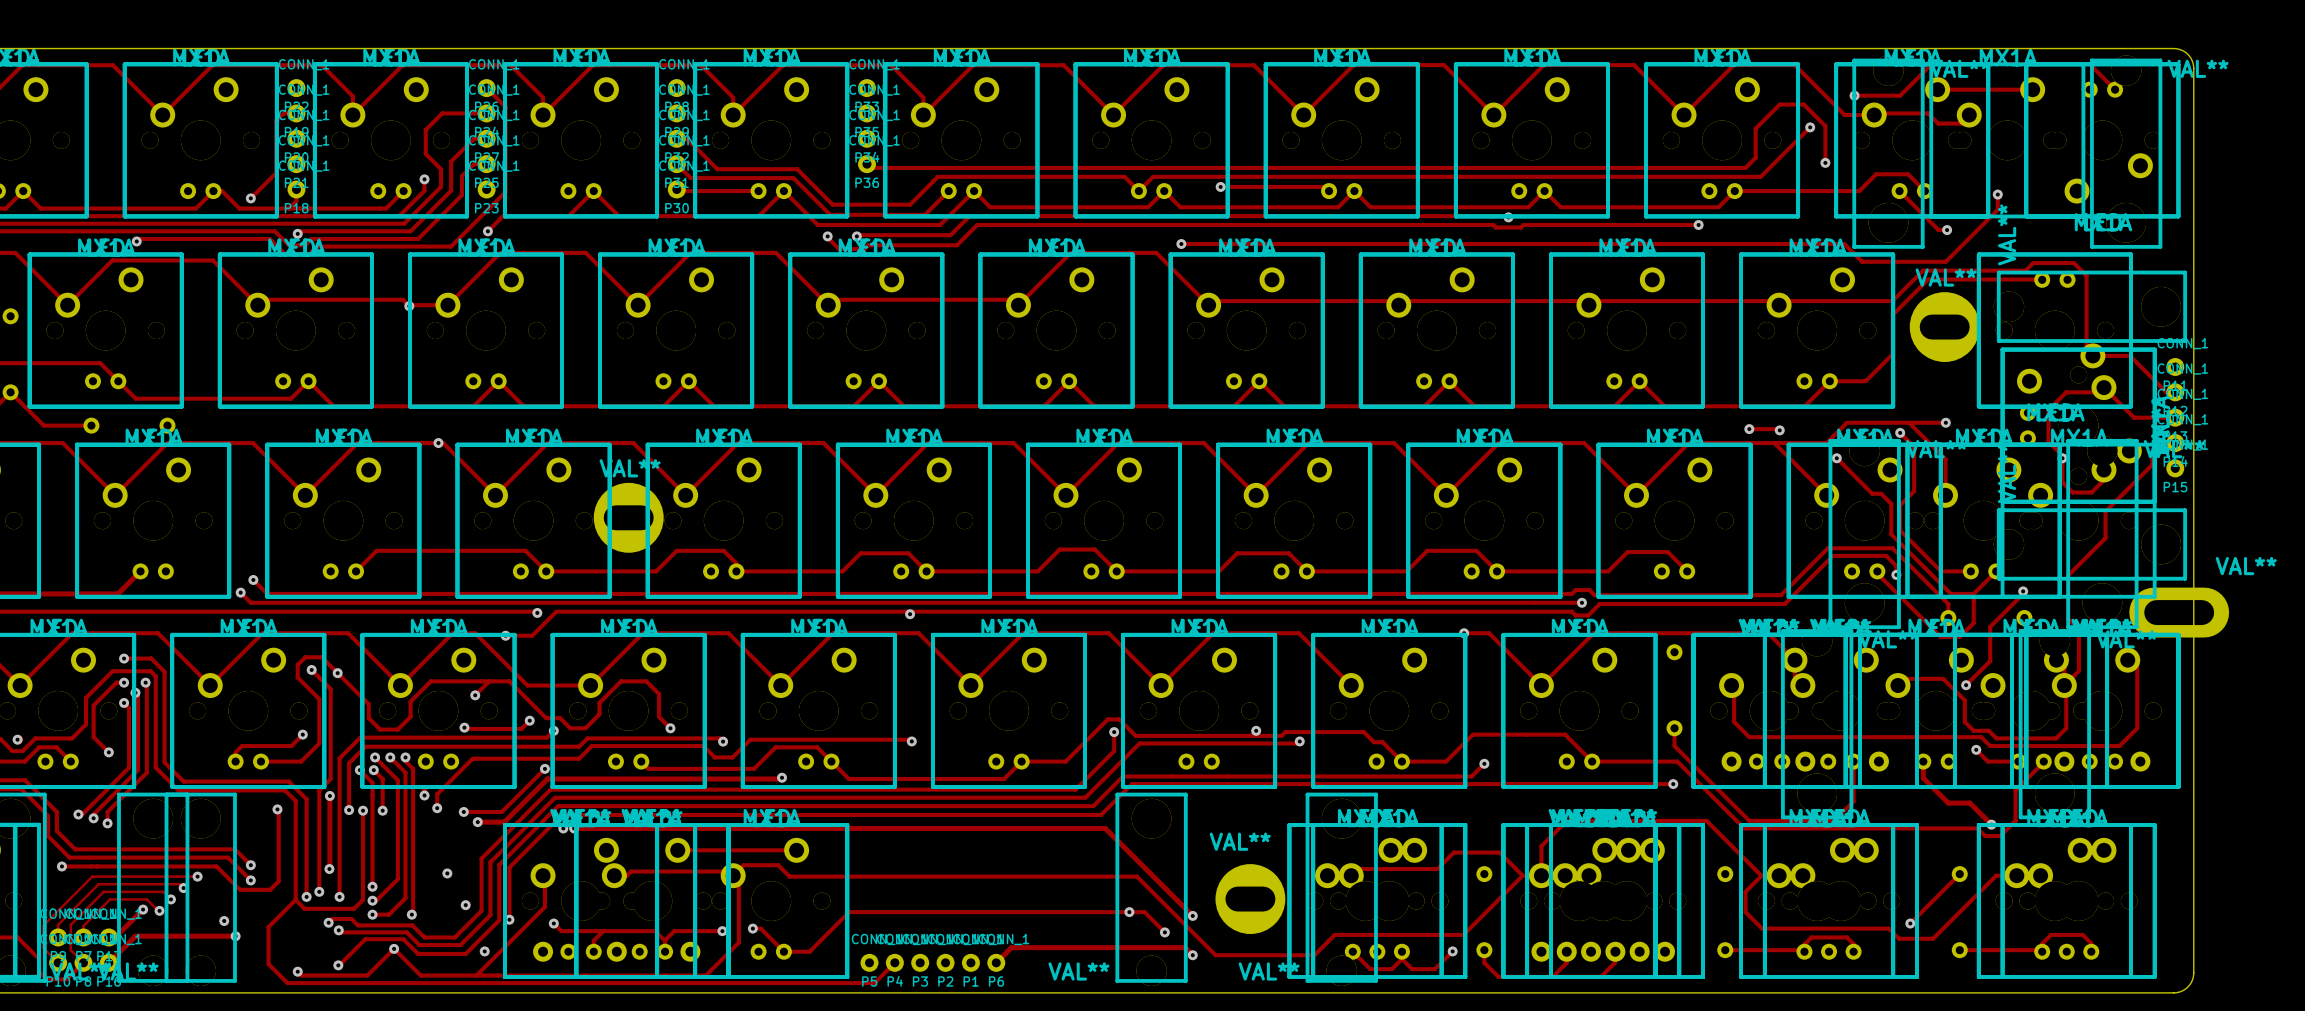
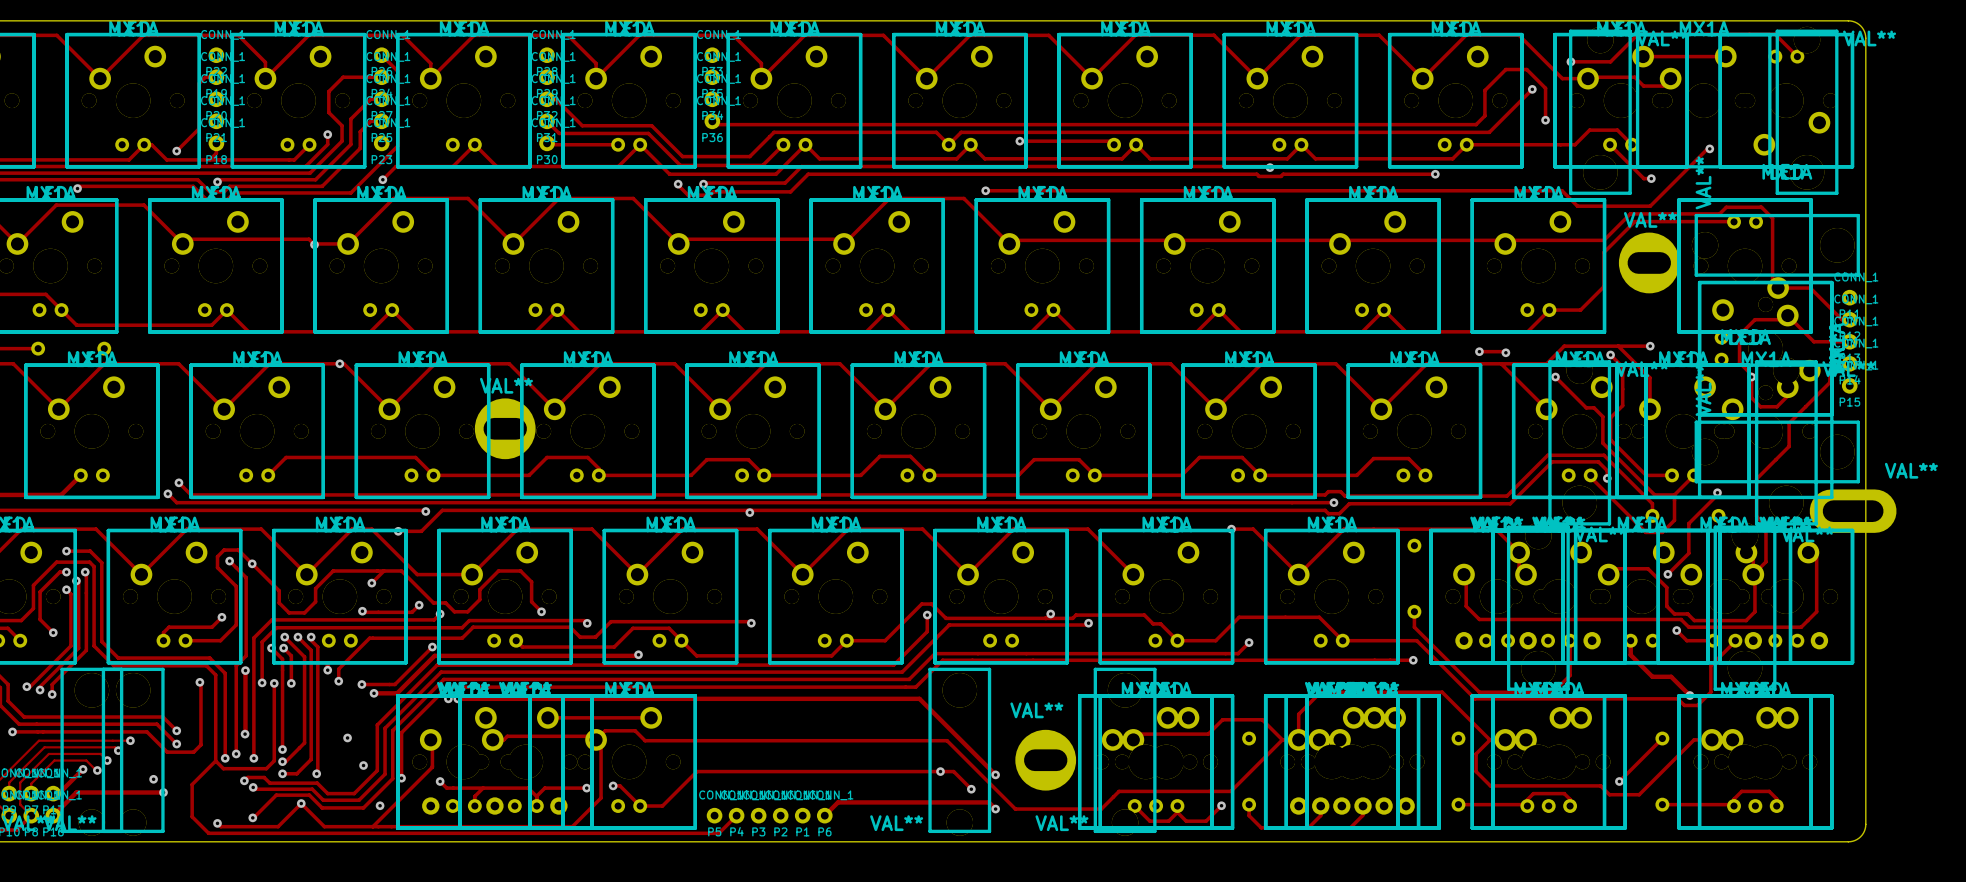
track: (1997, 194) (1997, 209) -> (1709, 148) (1695, 161)
via position: (1997, 194) -> (1709, 148)

